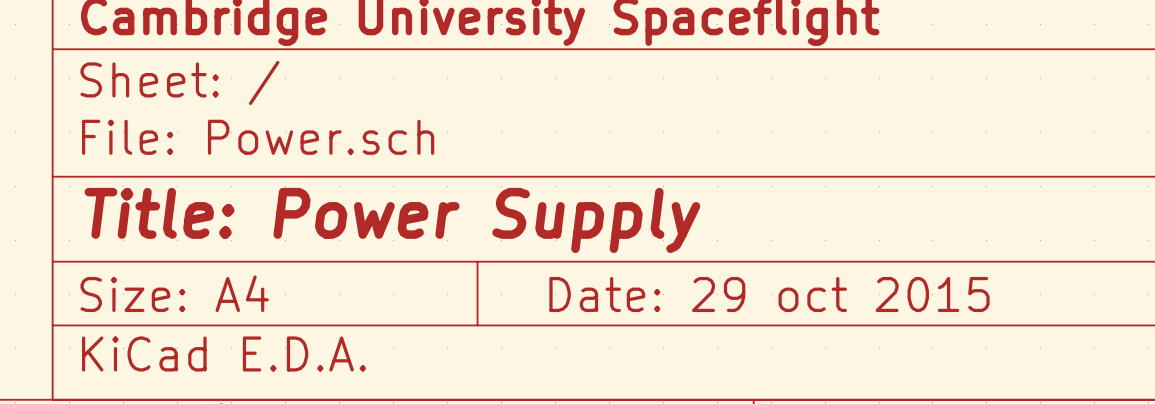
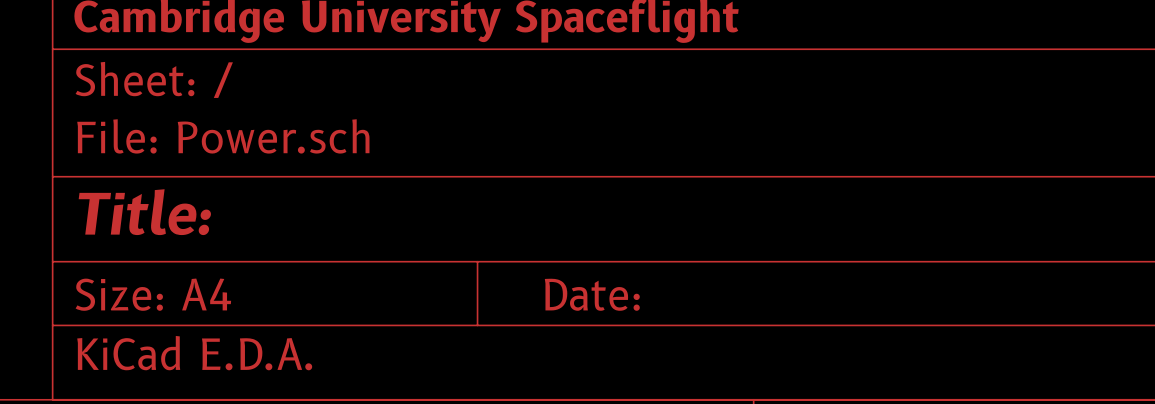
title block: Title: Power Supply (392, 220) -> Title: (144, 212)
title block: Date: 29 oct 2015 (769, 294) -> Date: (592, 294)

